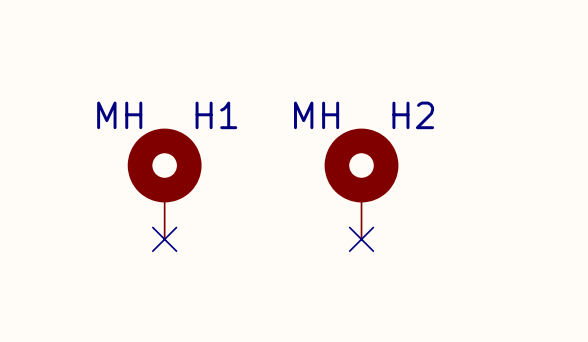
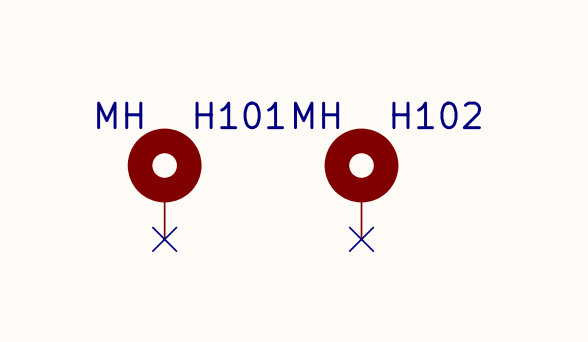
H1 name: H1 (216, 115) -> H101 (239, 115)
H2 name: H2 (413, 115) -> H102 (436, 115)

